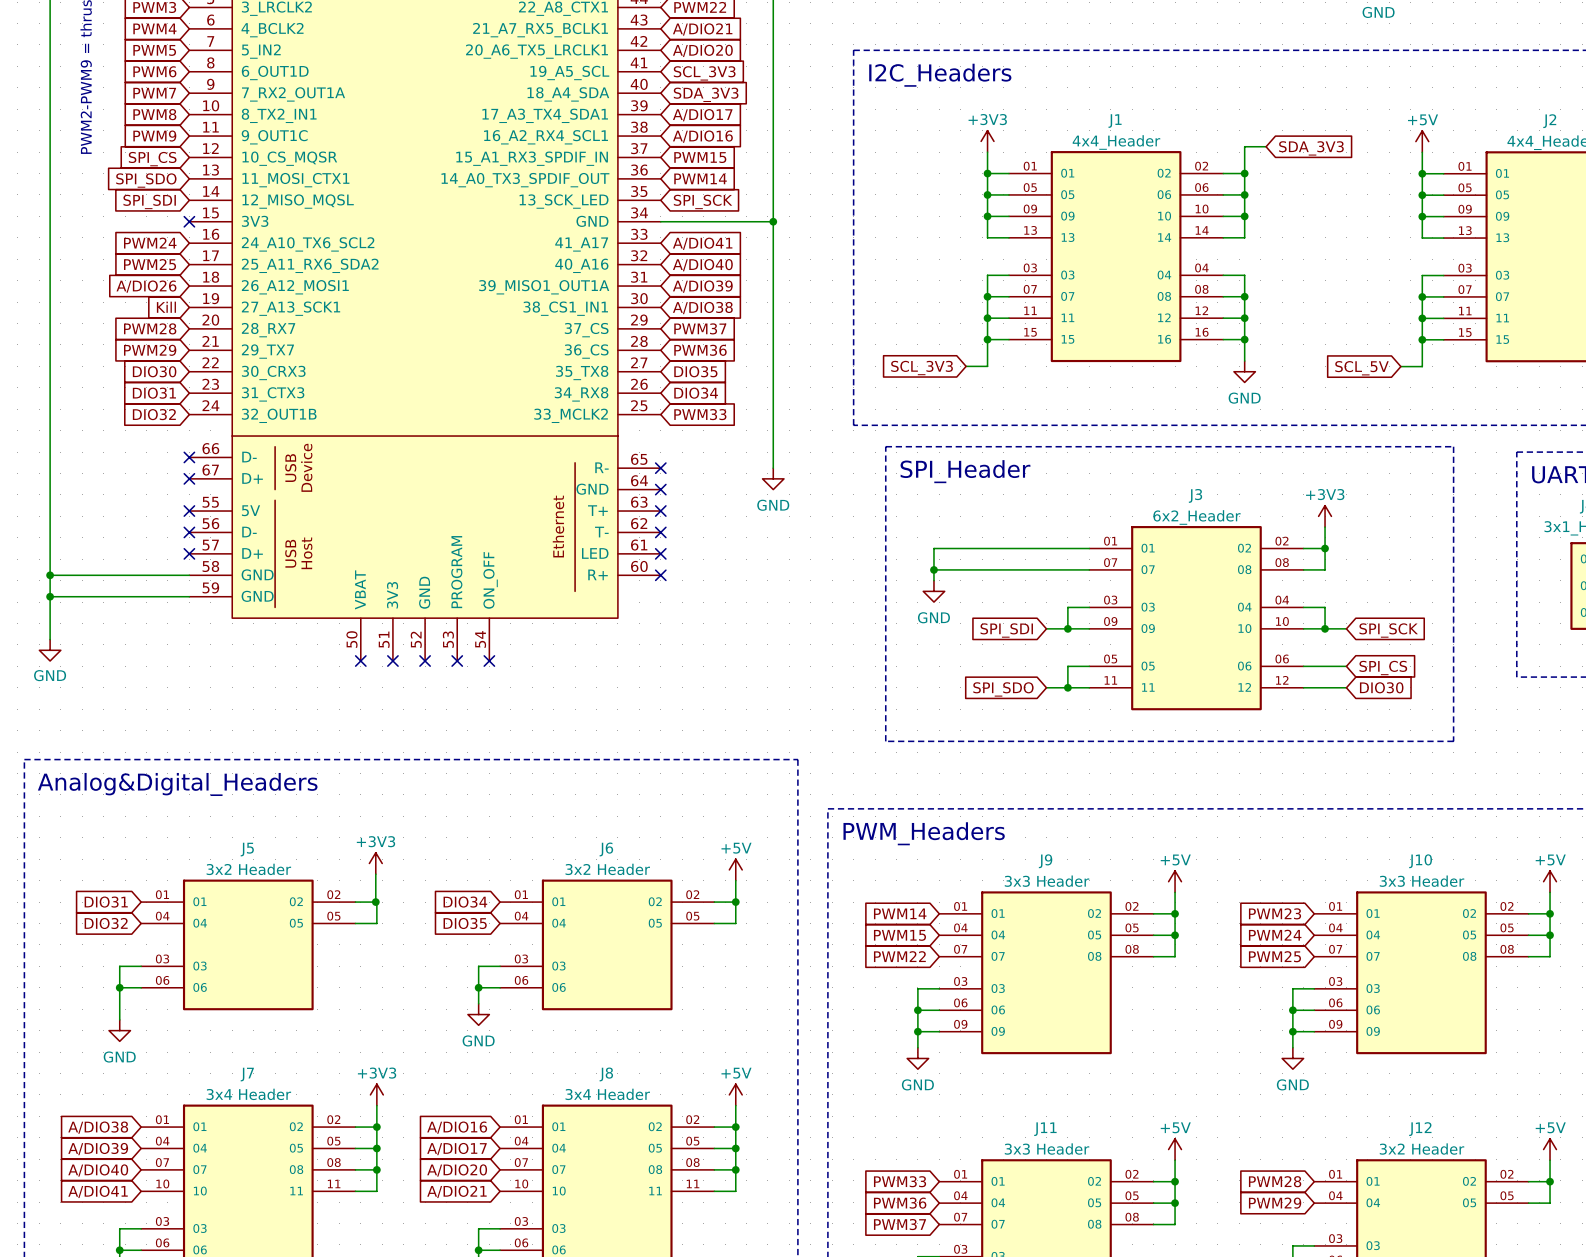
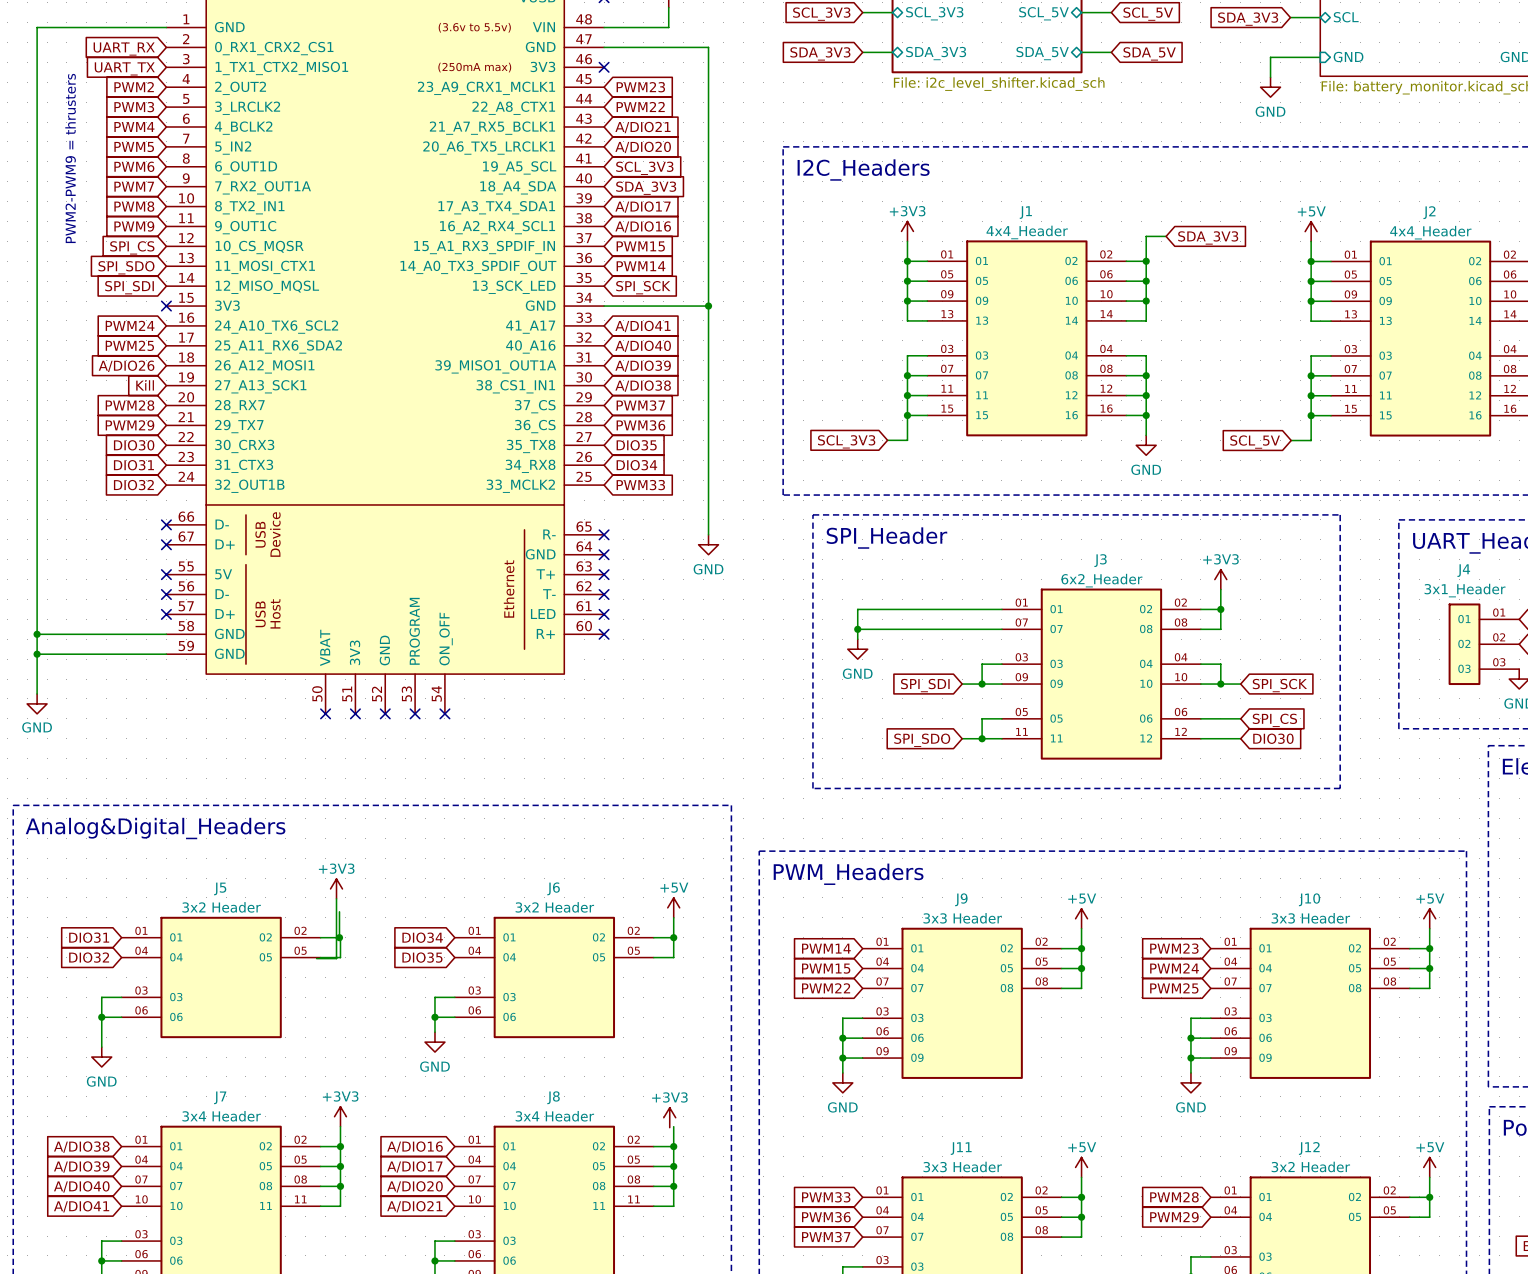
wire: none -> (336, 898) (336, 958) (316, 958)
power symbol position: +3V3 (375, 863) -> +3V3 (336, 888)
power symbol: +5V (735, 1094) -> +3V3 (669, 1117)

